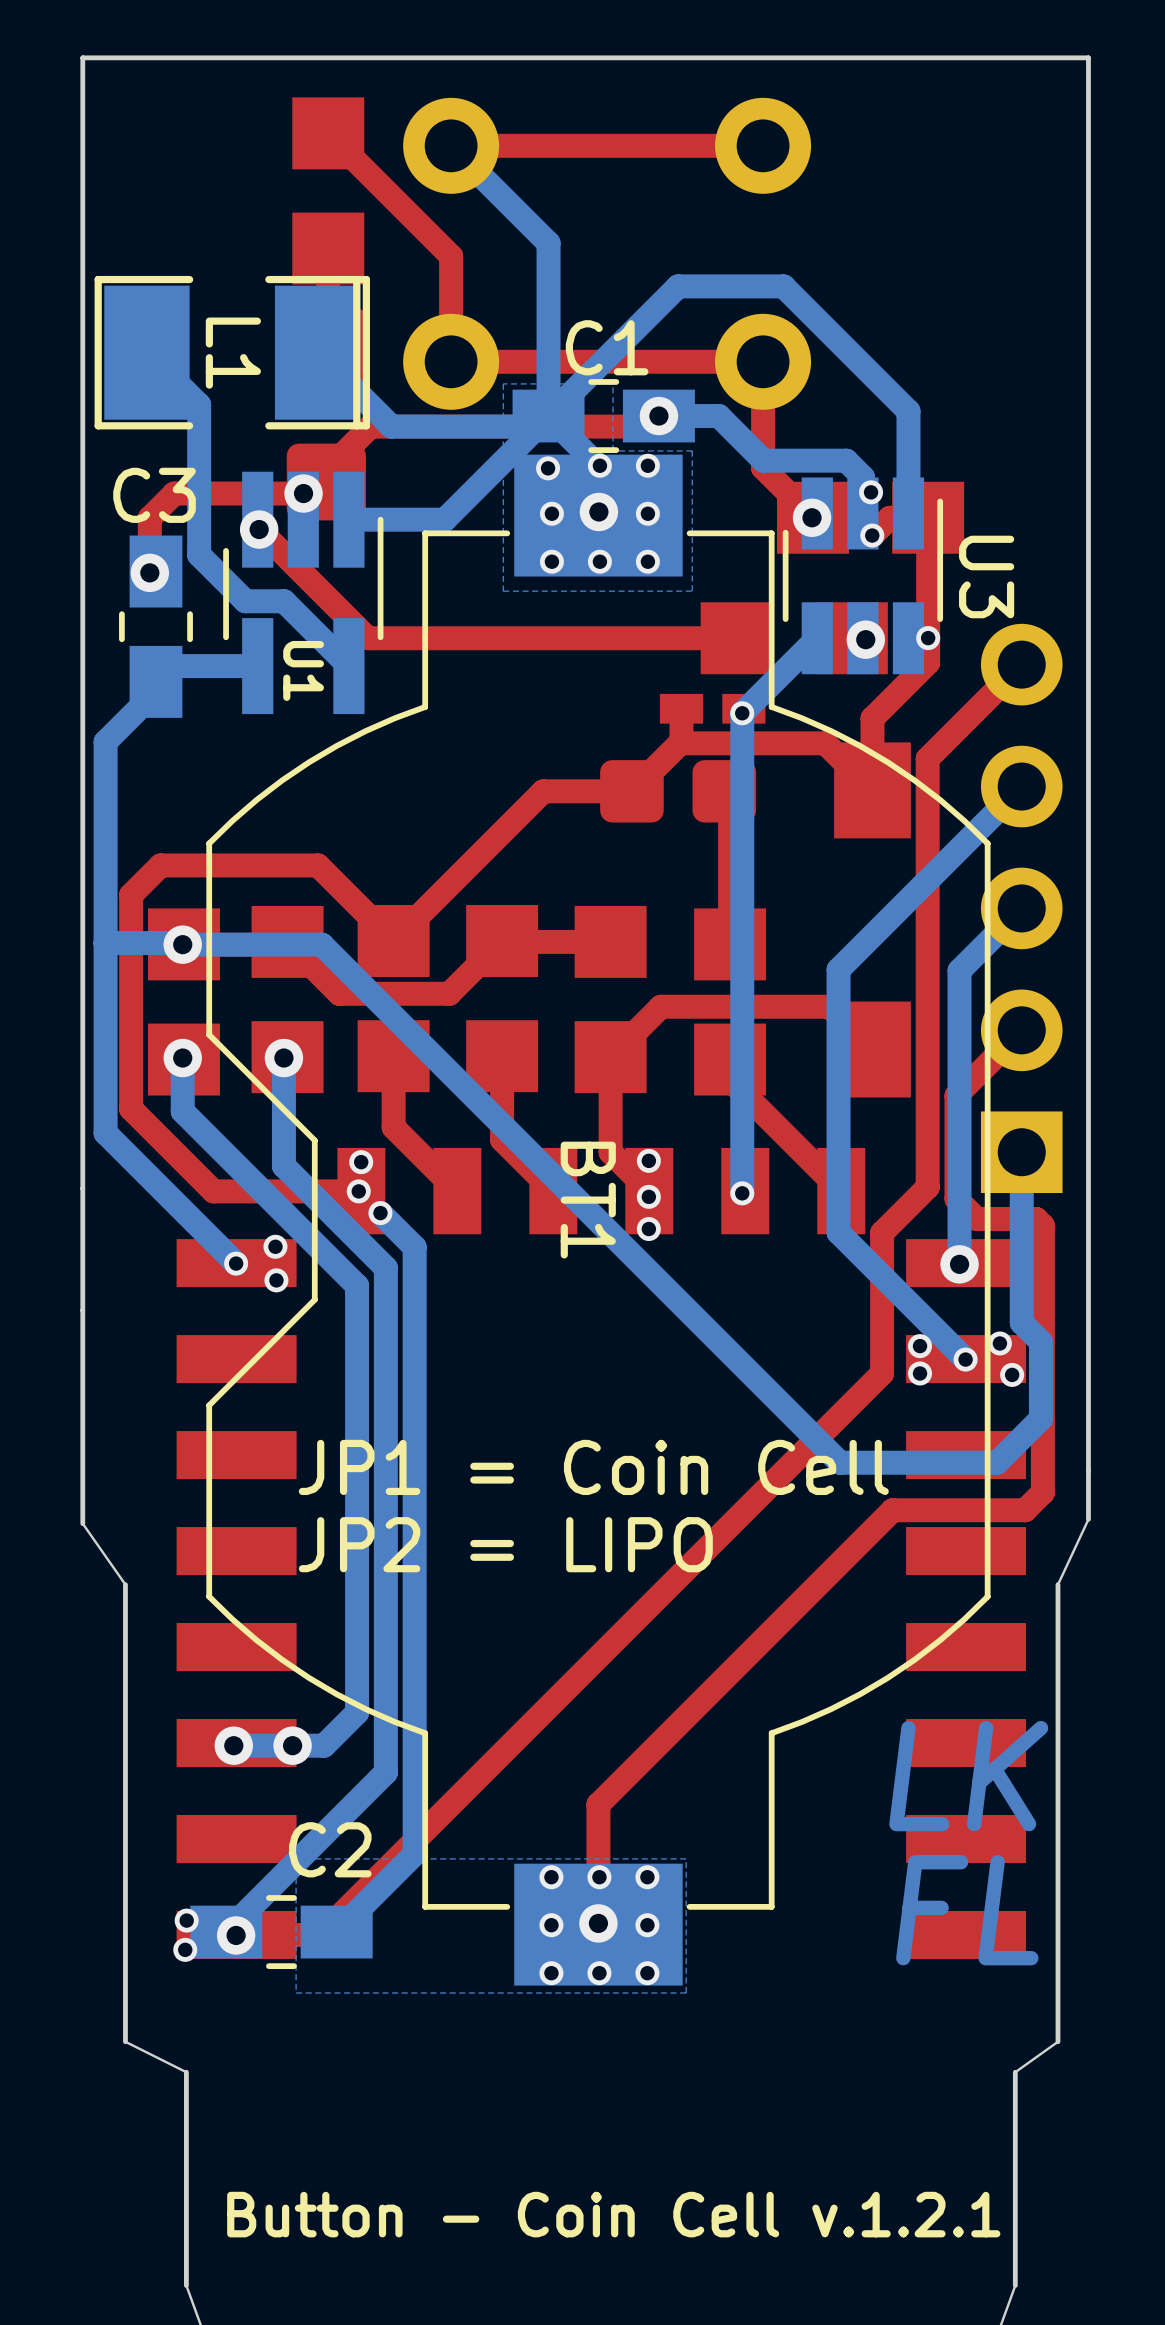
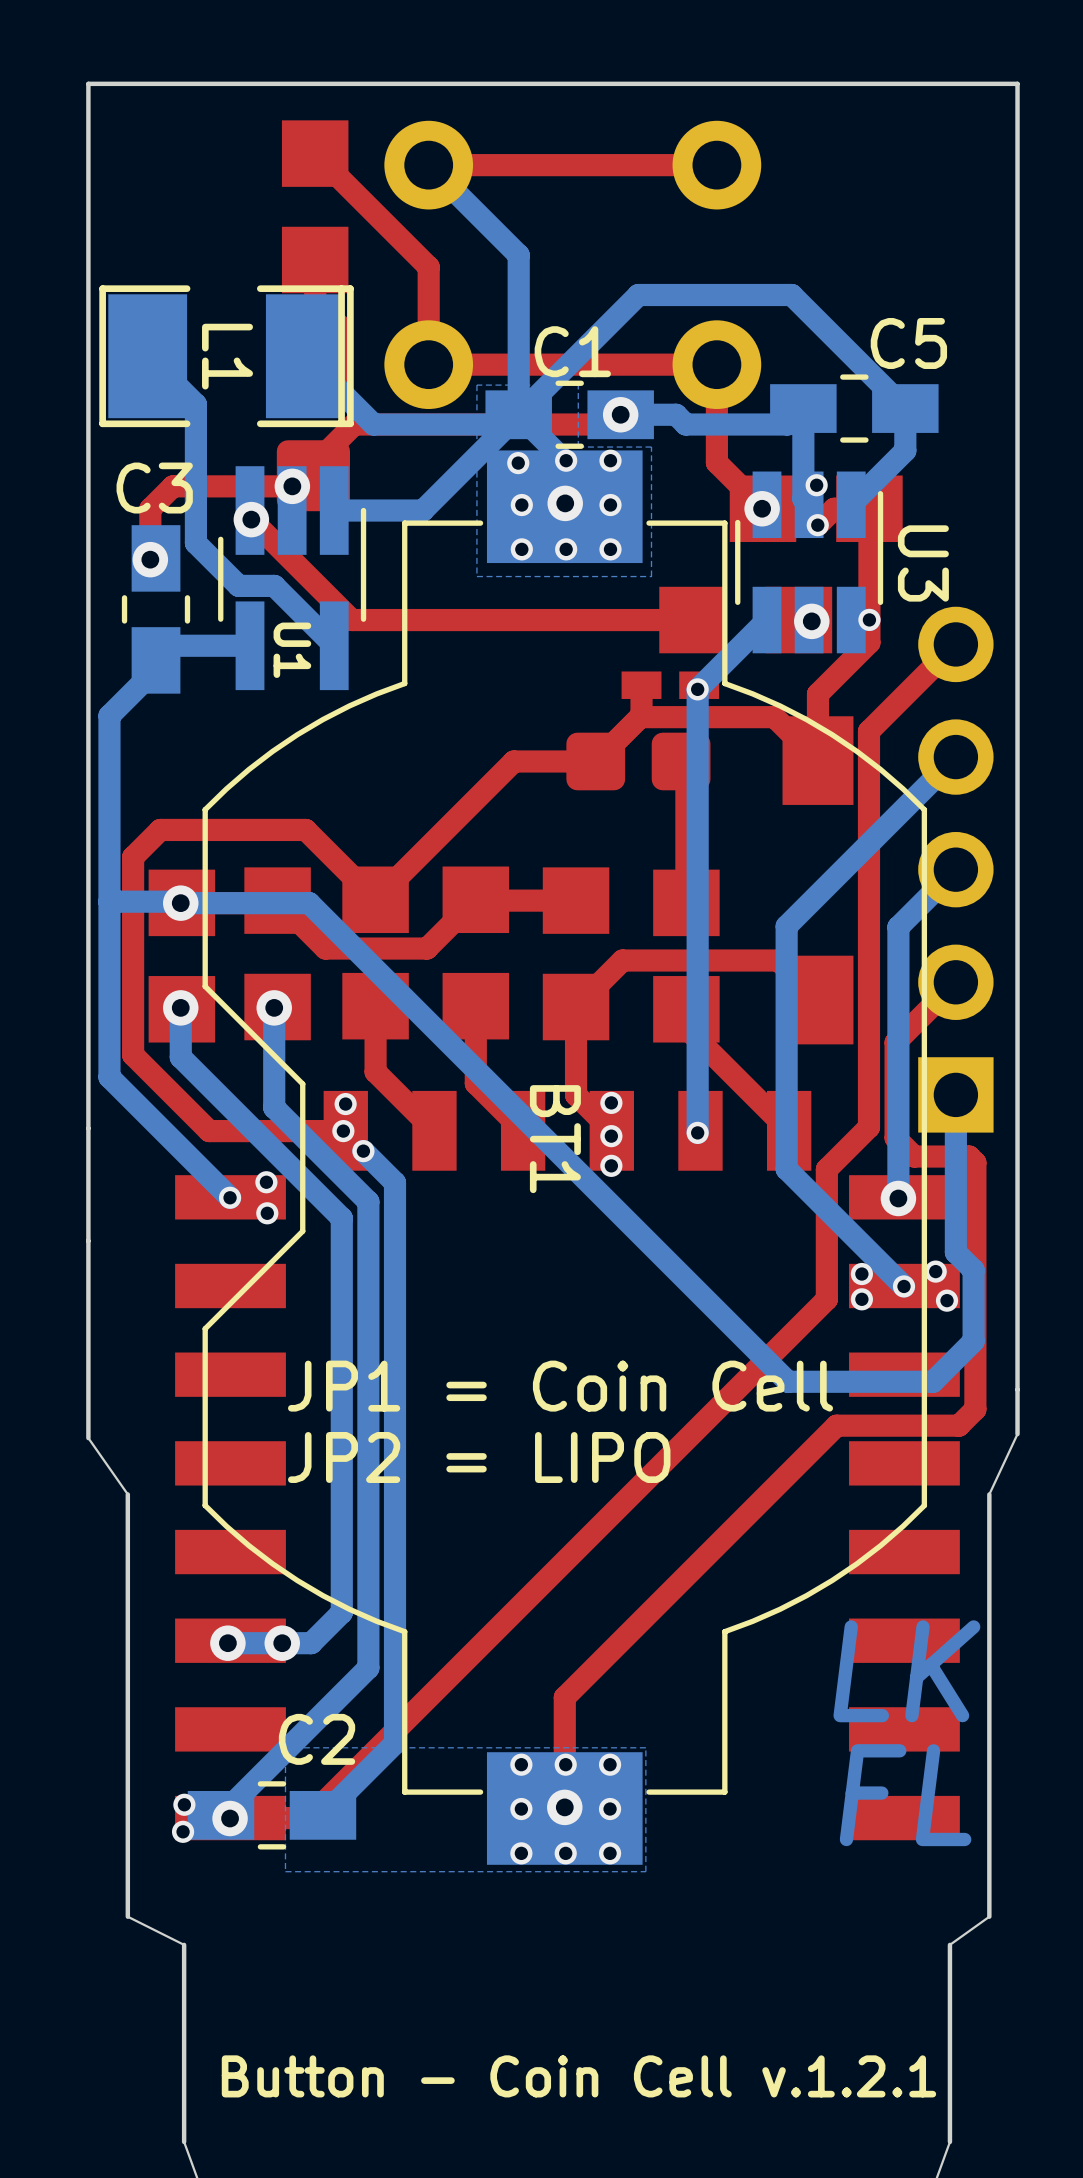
bottom track: (783, 286) (908, 411) (908, 513) -> (735, 295) (791, 295) (905, 408) (905, 450) (851, 504)
C5: none -> (854, 408)
bottom track: (729, 426) (763, 460) (846, 460) (862, 477) (862, 513) -> (685, 424) (787, 424) (803, 408) (803, 499) (809, 504)

